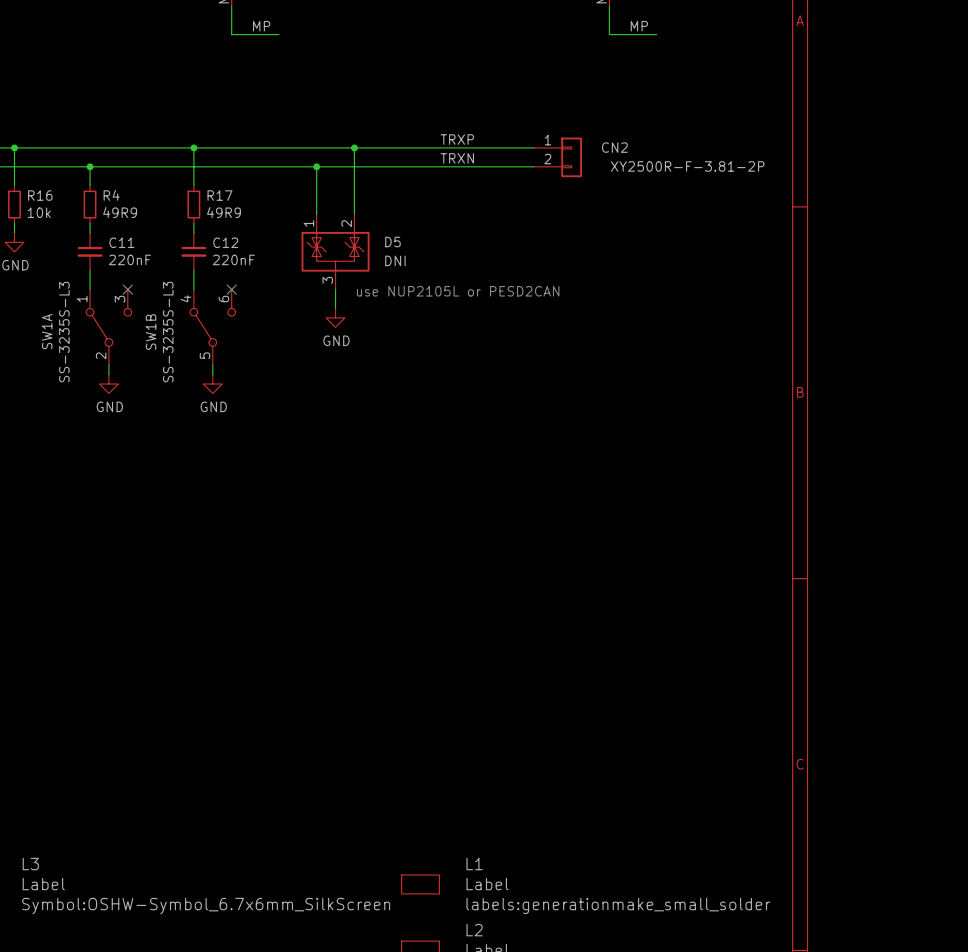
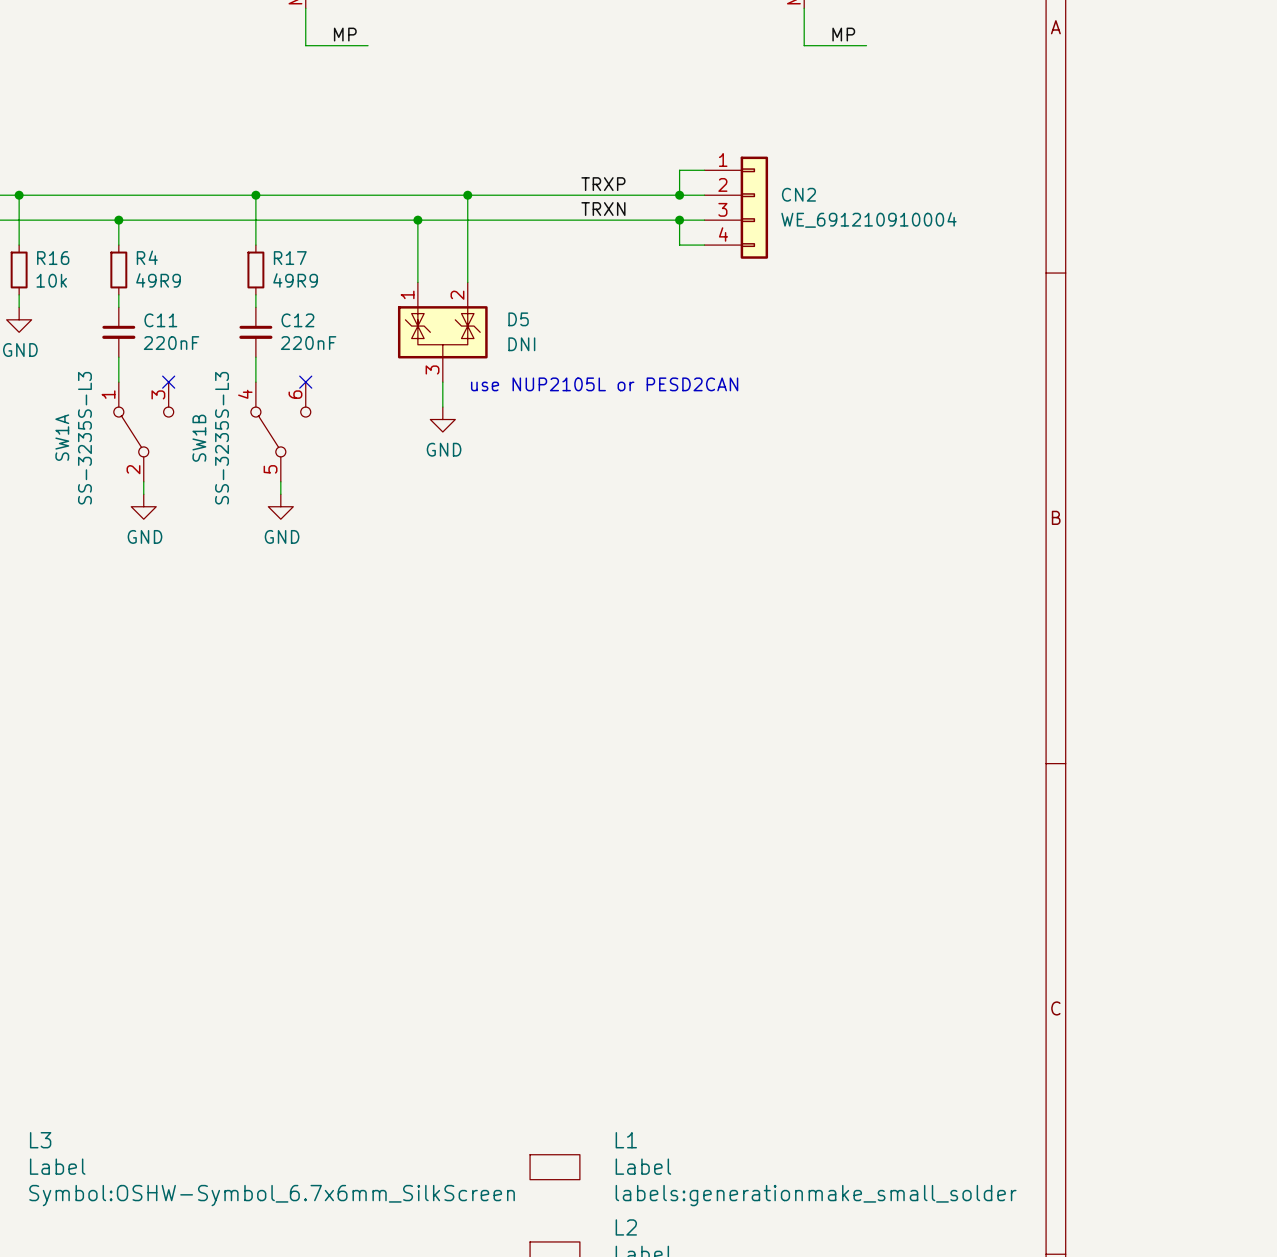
wire: none -> (704, 170) (679, 170) (679, 195)
CN2 symbol: [533, 137, 583, 178] -> [704, 156, 769, 259]
junction: none -> (679, 195)
wire: none -> (679, 220) (679, 245) (704, 245)
junction: none -> (679, 220)
CN2 value: XY2500R-F-3.81-2P (687, 166) -> WE_691210910004 (868, 219)

